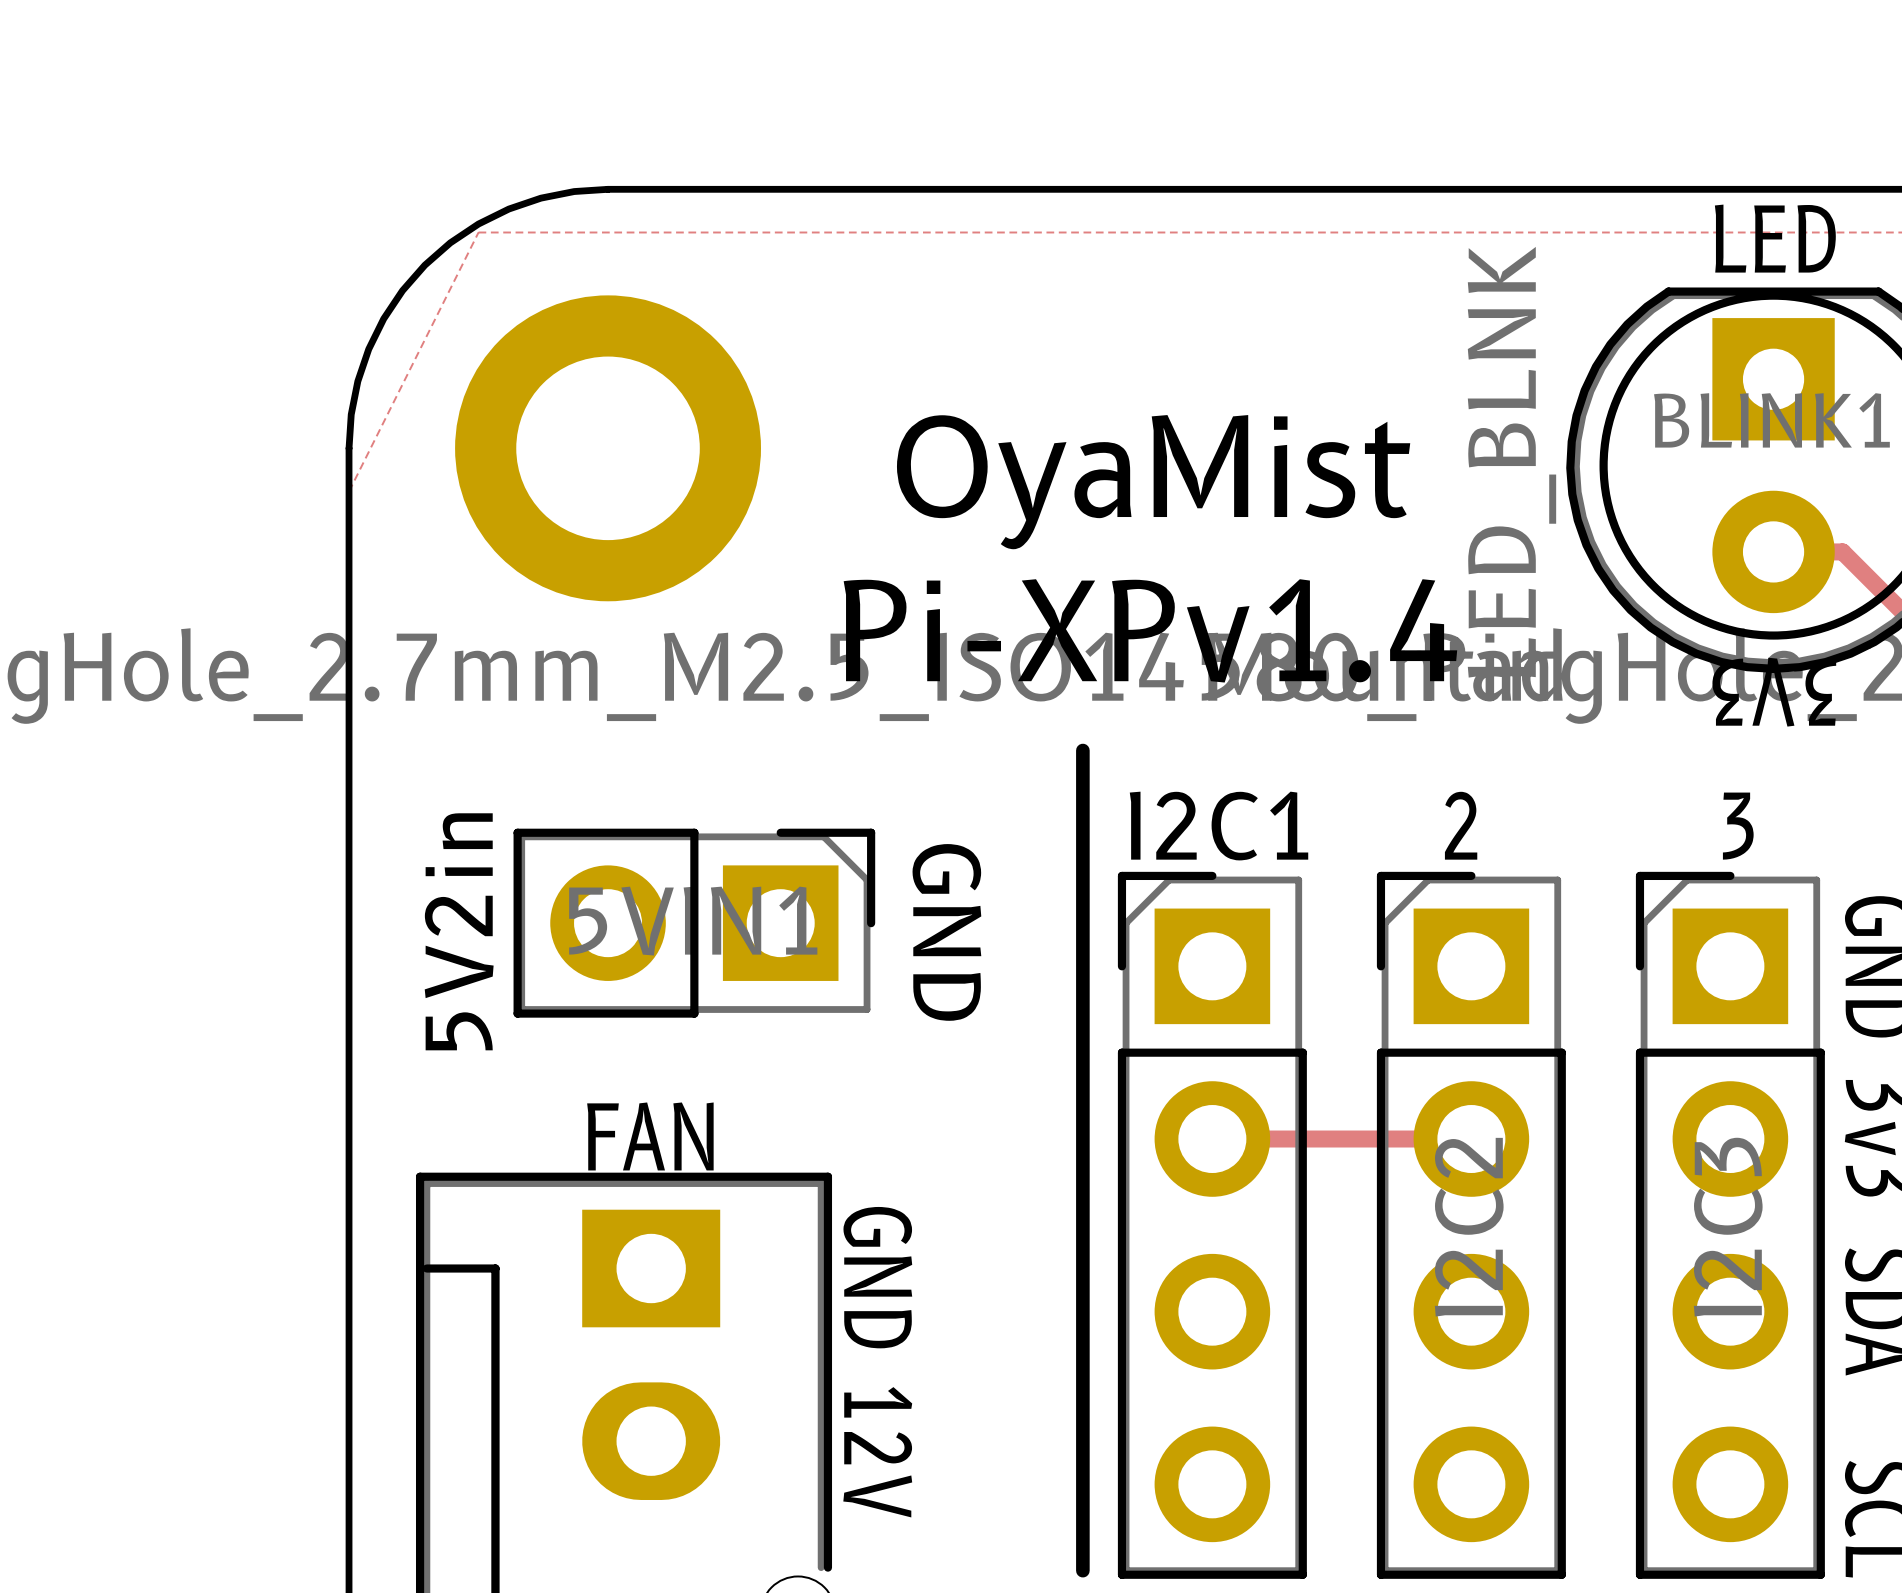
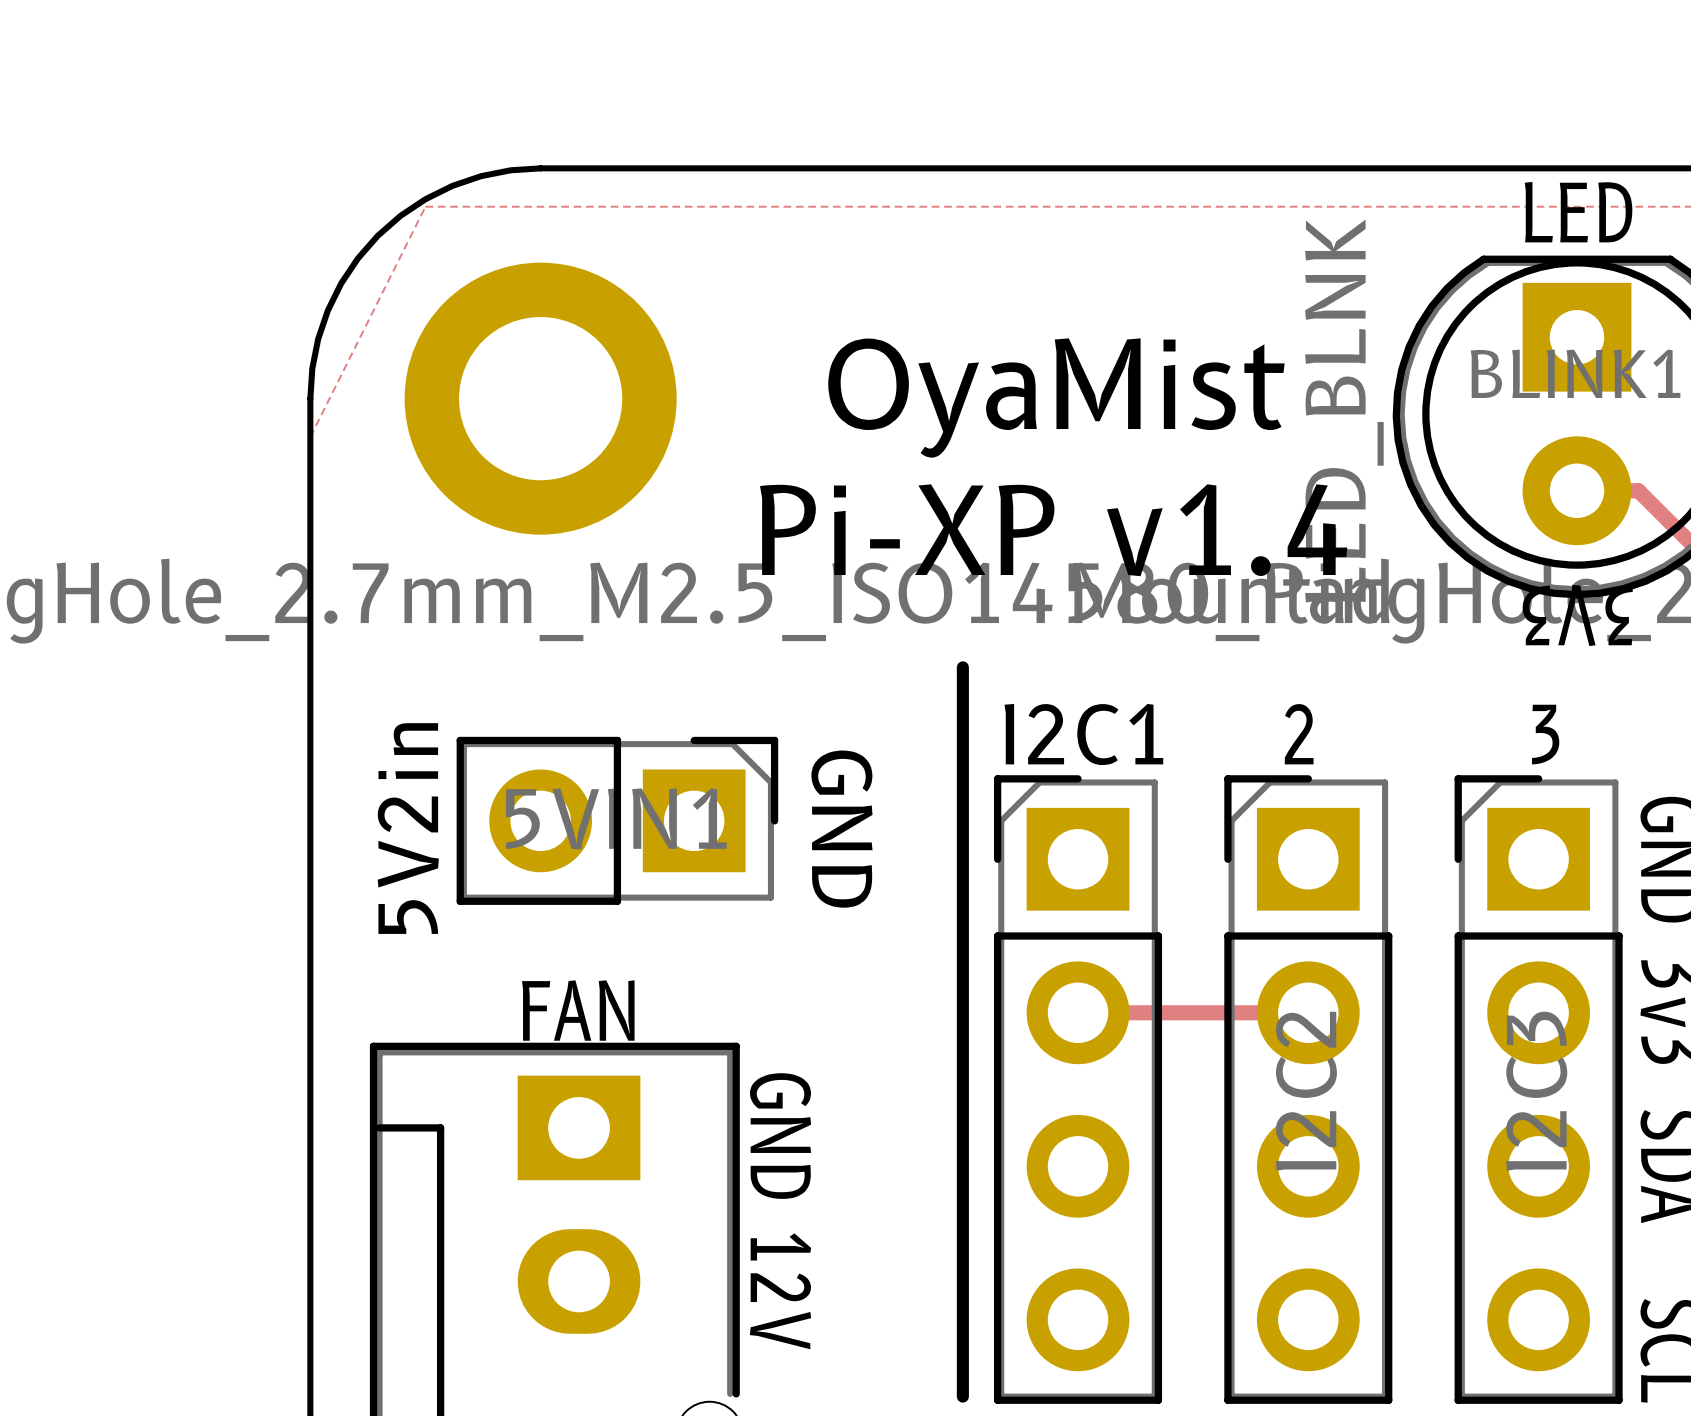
text position: OyaMist (1153, 482) -> OyaMist (1056, 397)
text: Pi-XPv1.4 (1150, 630) -> Pi-XP v1.4 (1053, 530)

